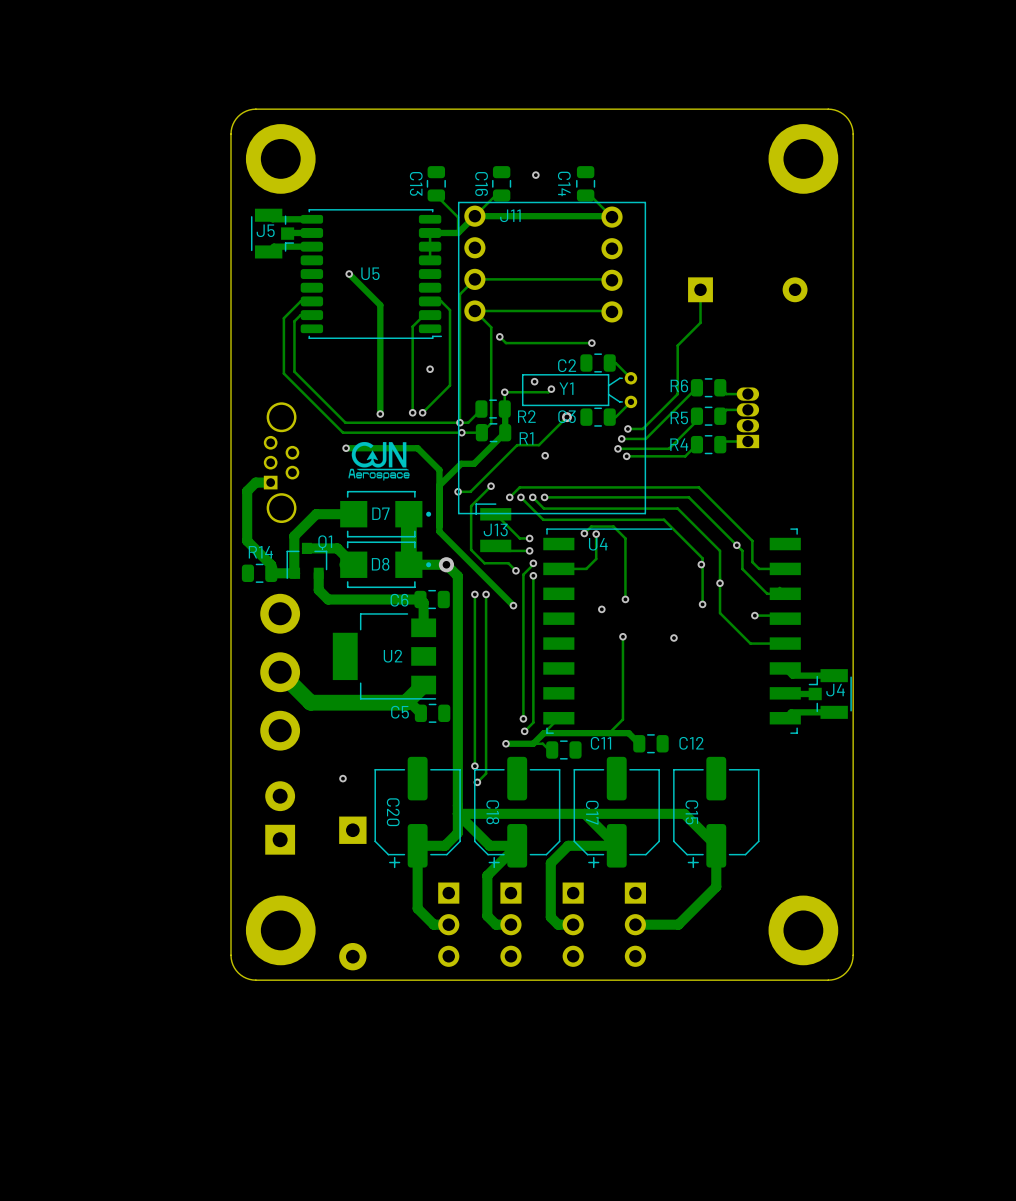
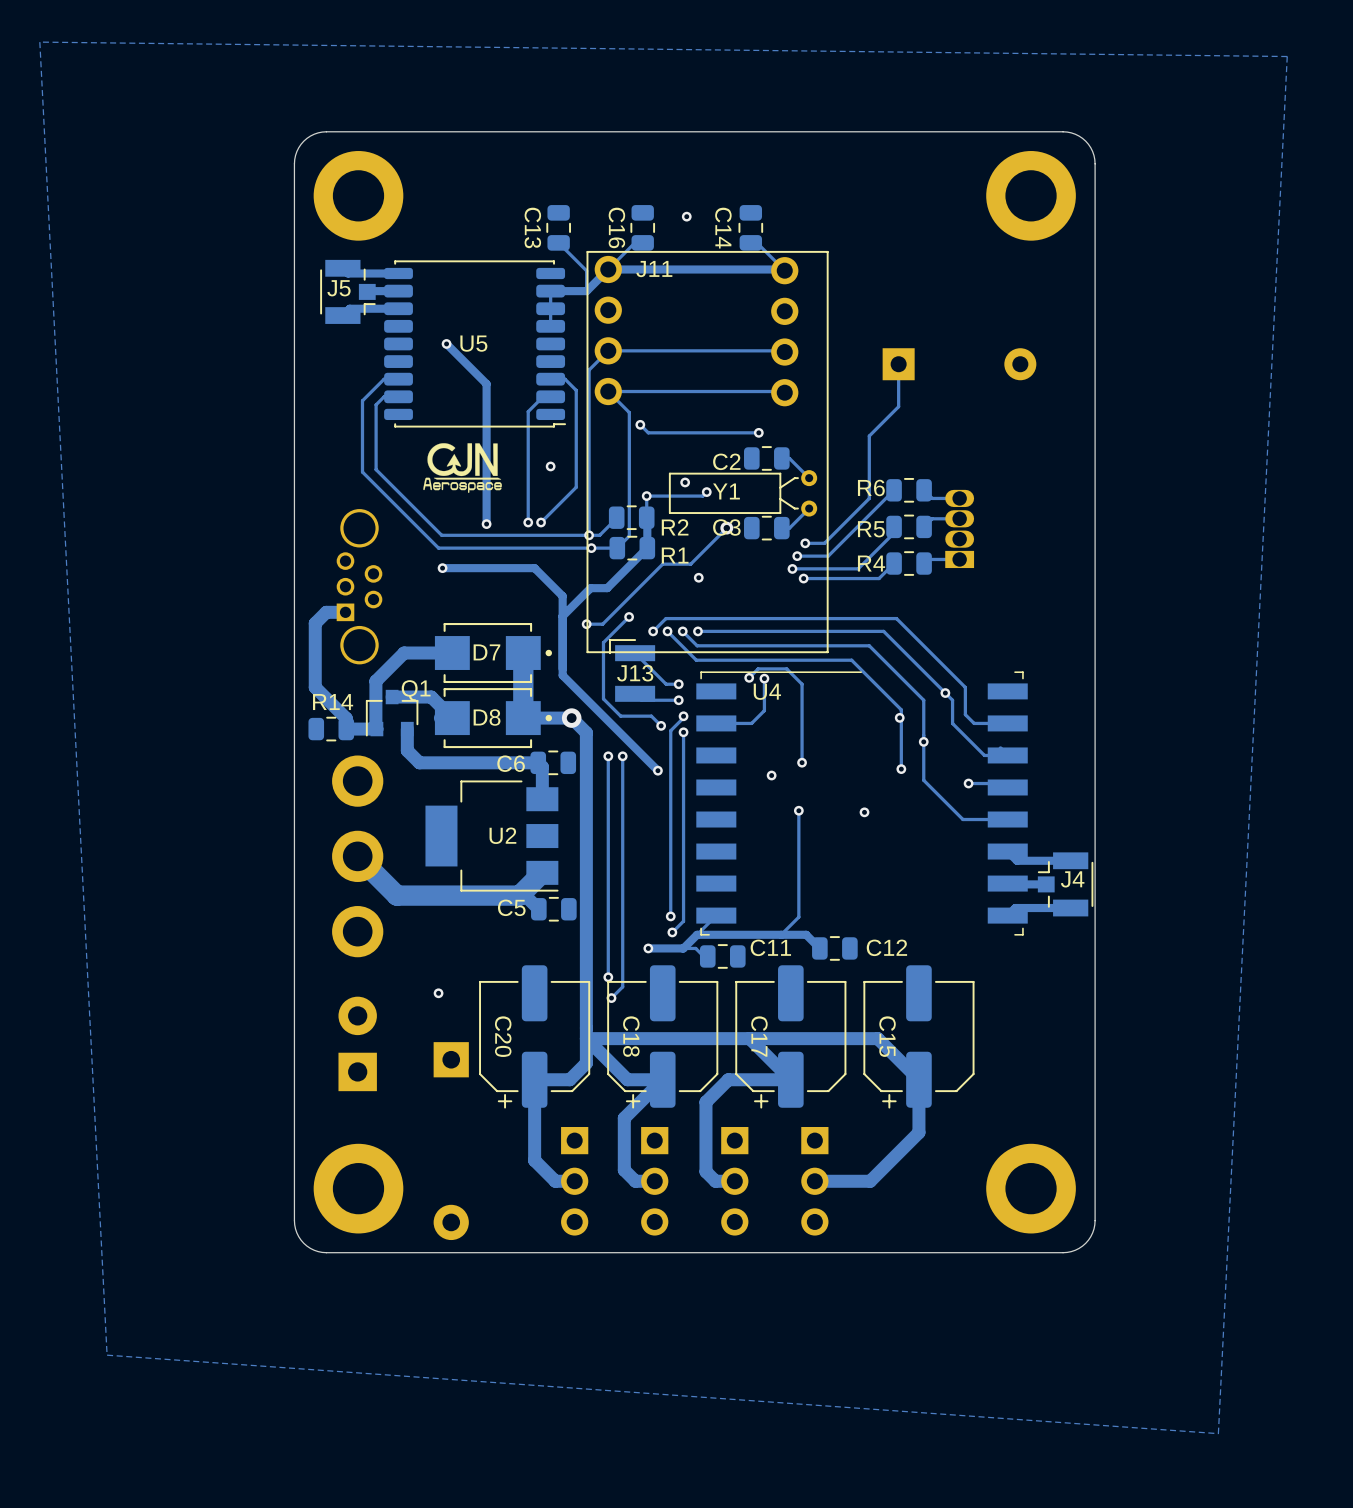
zone outline: none -> (39, 42) (1287, 56) (1218, 1433) (107, 1355) (39, 42)
drawing position: (379, 461) -> (462, 468)

